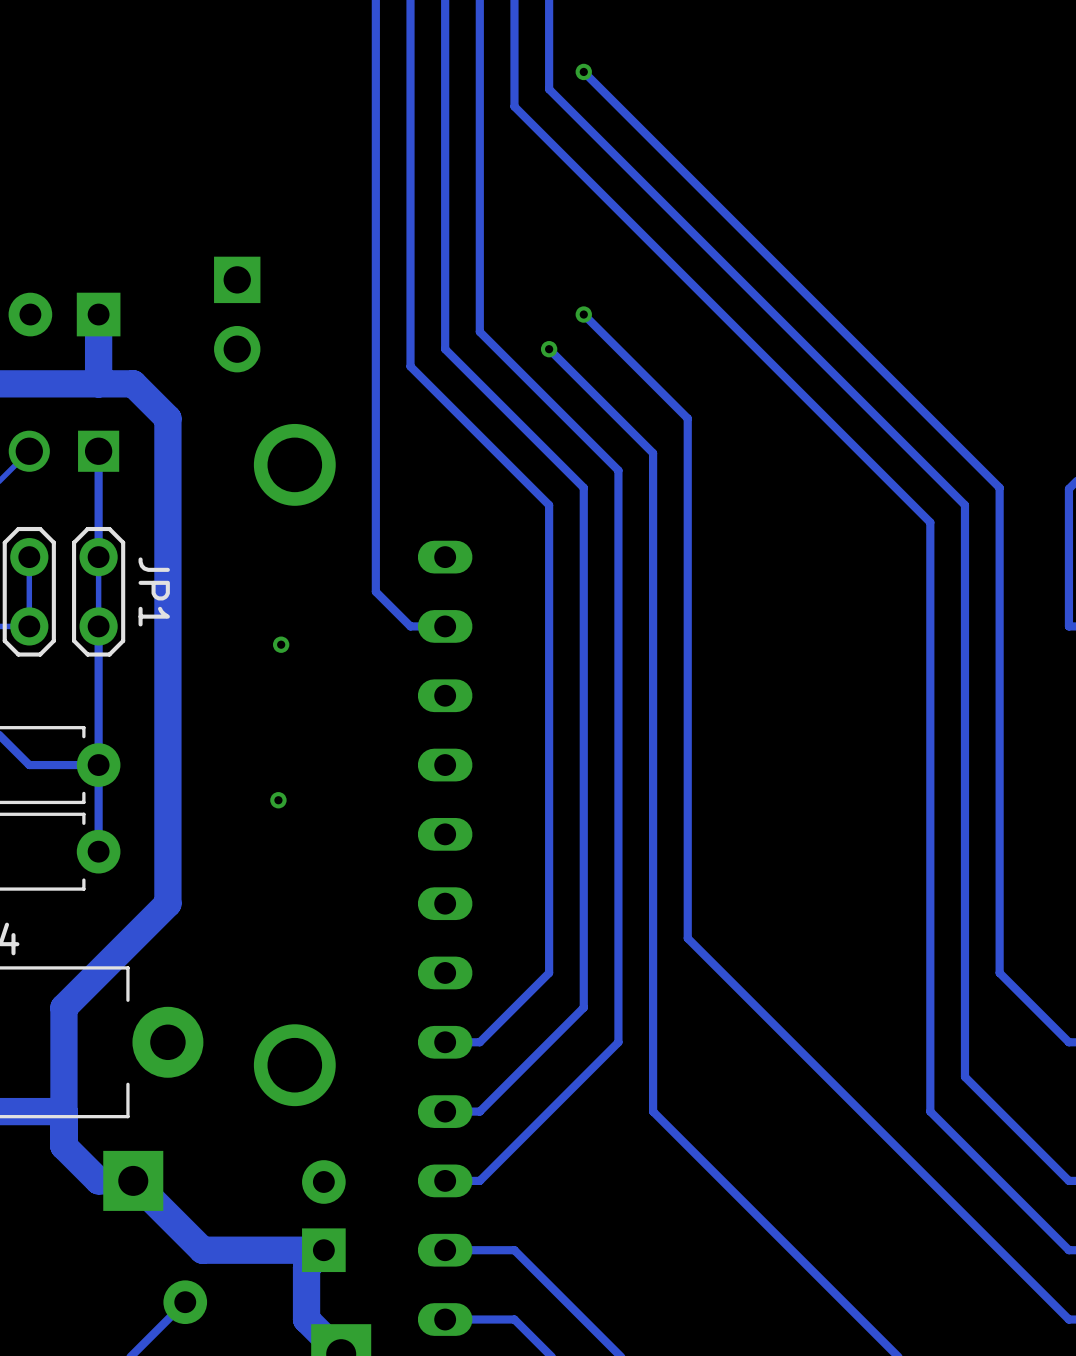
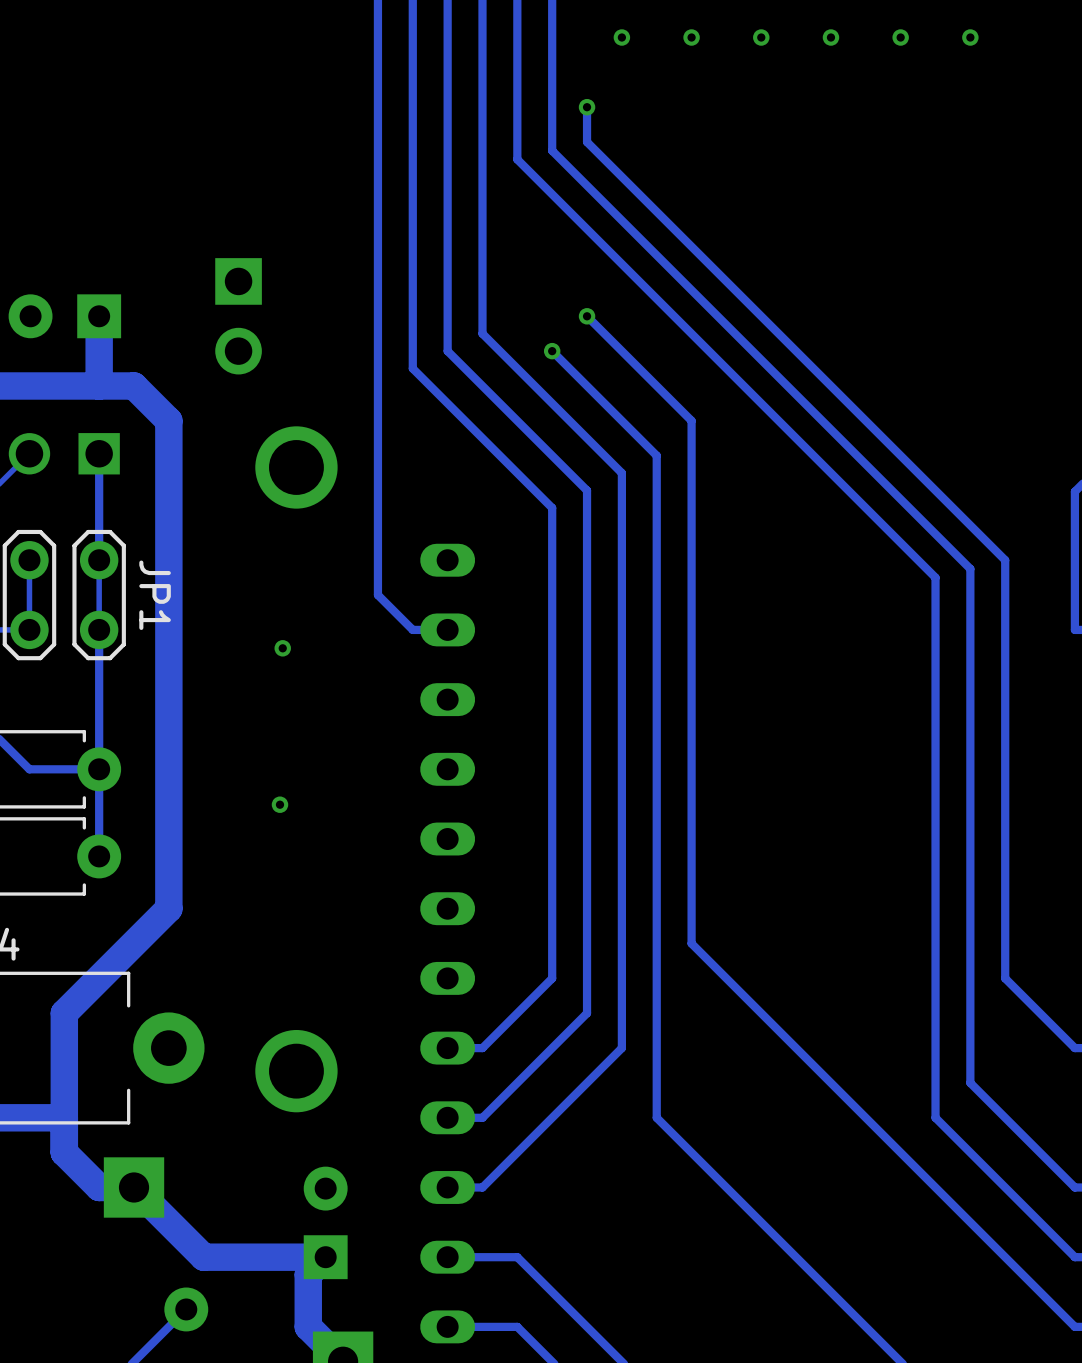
via: none -> (621, 37)
via: none -> (691, 37)
via: none -> (761, 37)
via: none -> (830, 37)
via: none -> (900, 37)
via: none -> (970, 37)
track: (583, 71) (999, 487) (999, 557) -> (587, 107) (587, 142) (1005, 560)
via: (583, 71) -> none
track: (549, 89) (964, 505) (964, 565) -> (552, 89) (552, 150) (970, 568)
track: (514, 106) (930, 522) (930, 574) -> (517, 107) (517, 159) (935, 577)
via: none -> (587, 107)

